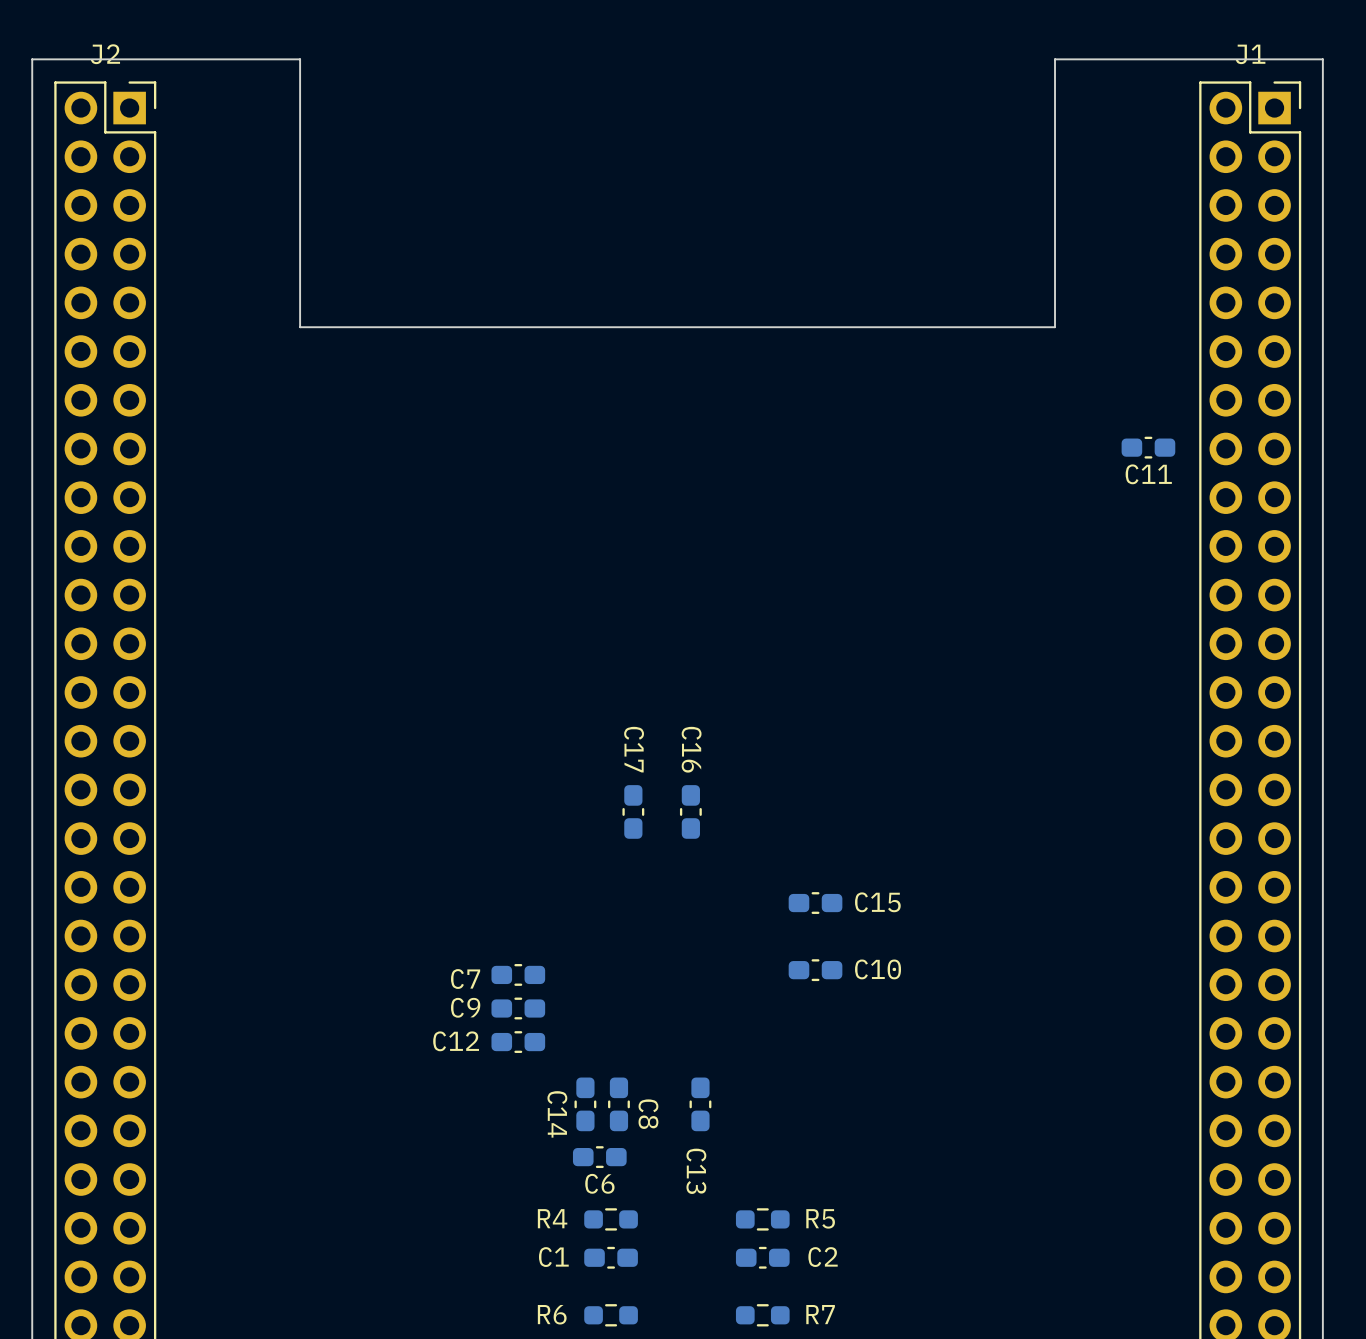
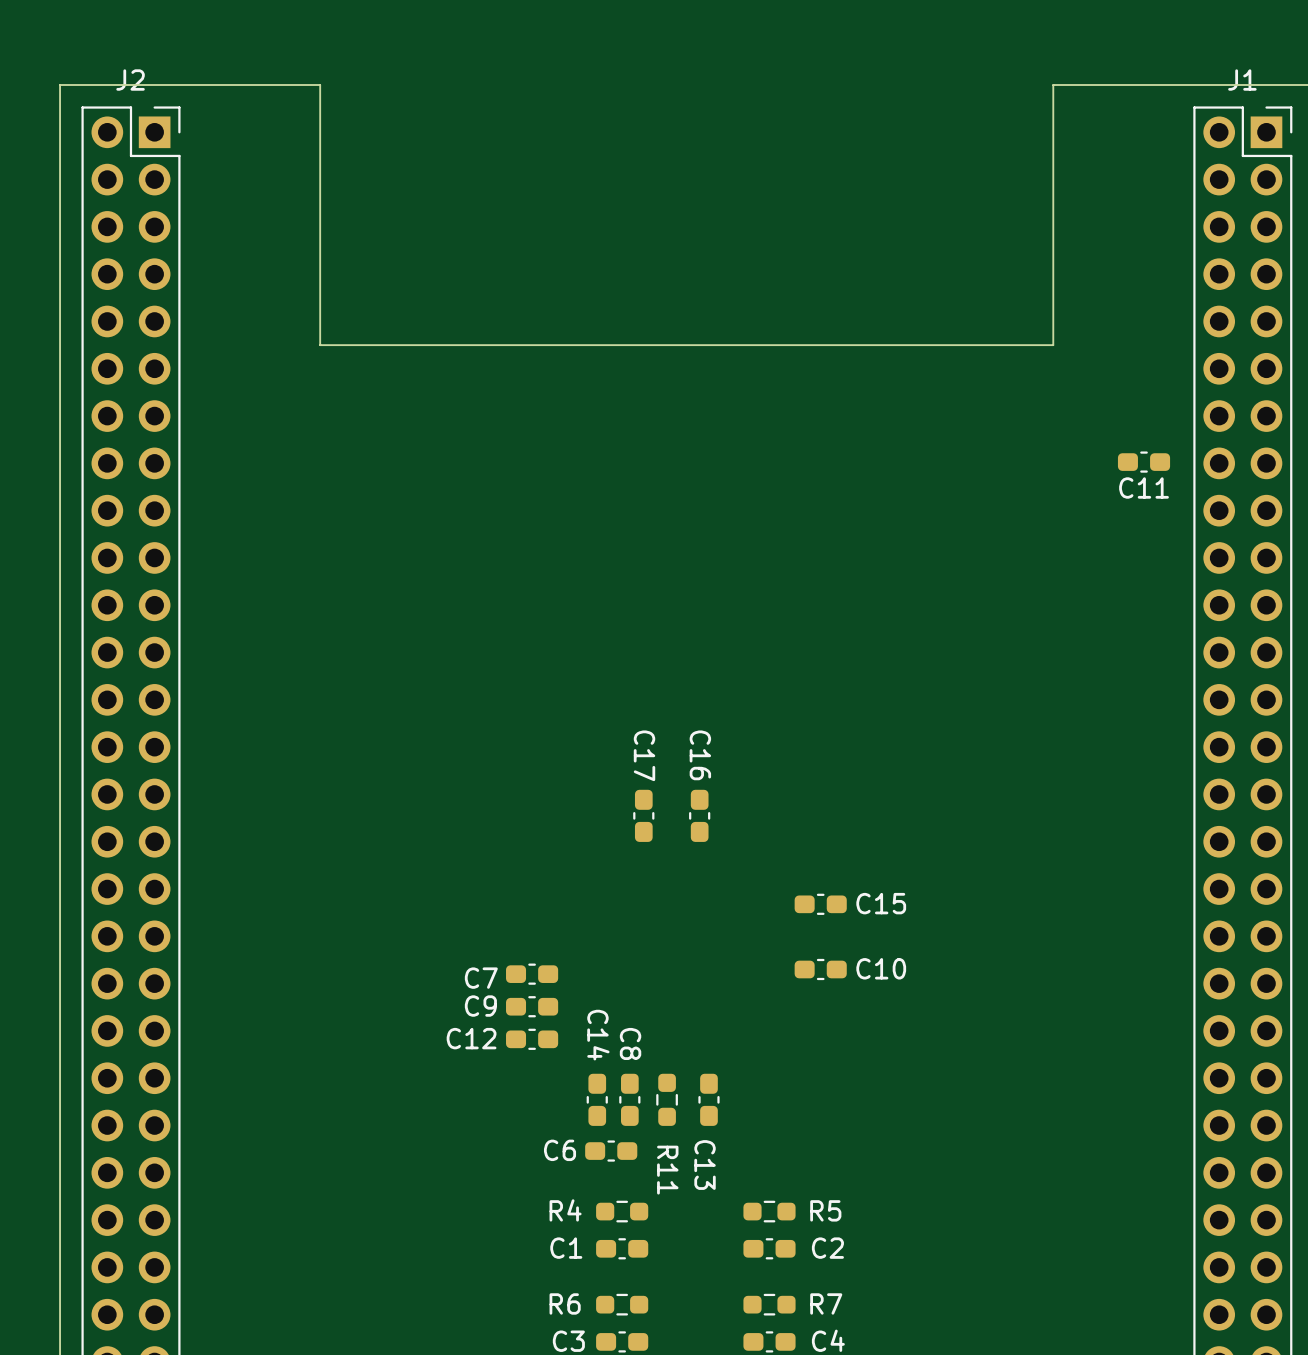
R11: none -> (667, 1099)
C14 name position: C14 (557, 1114) -> C14 (598, 1035)
C8 name position: C8 (648, 1114) -> C8 (630, 1043)
C6 name position: C6 (599, 1183) -> C6 (560, 1150)

